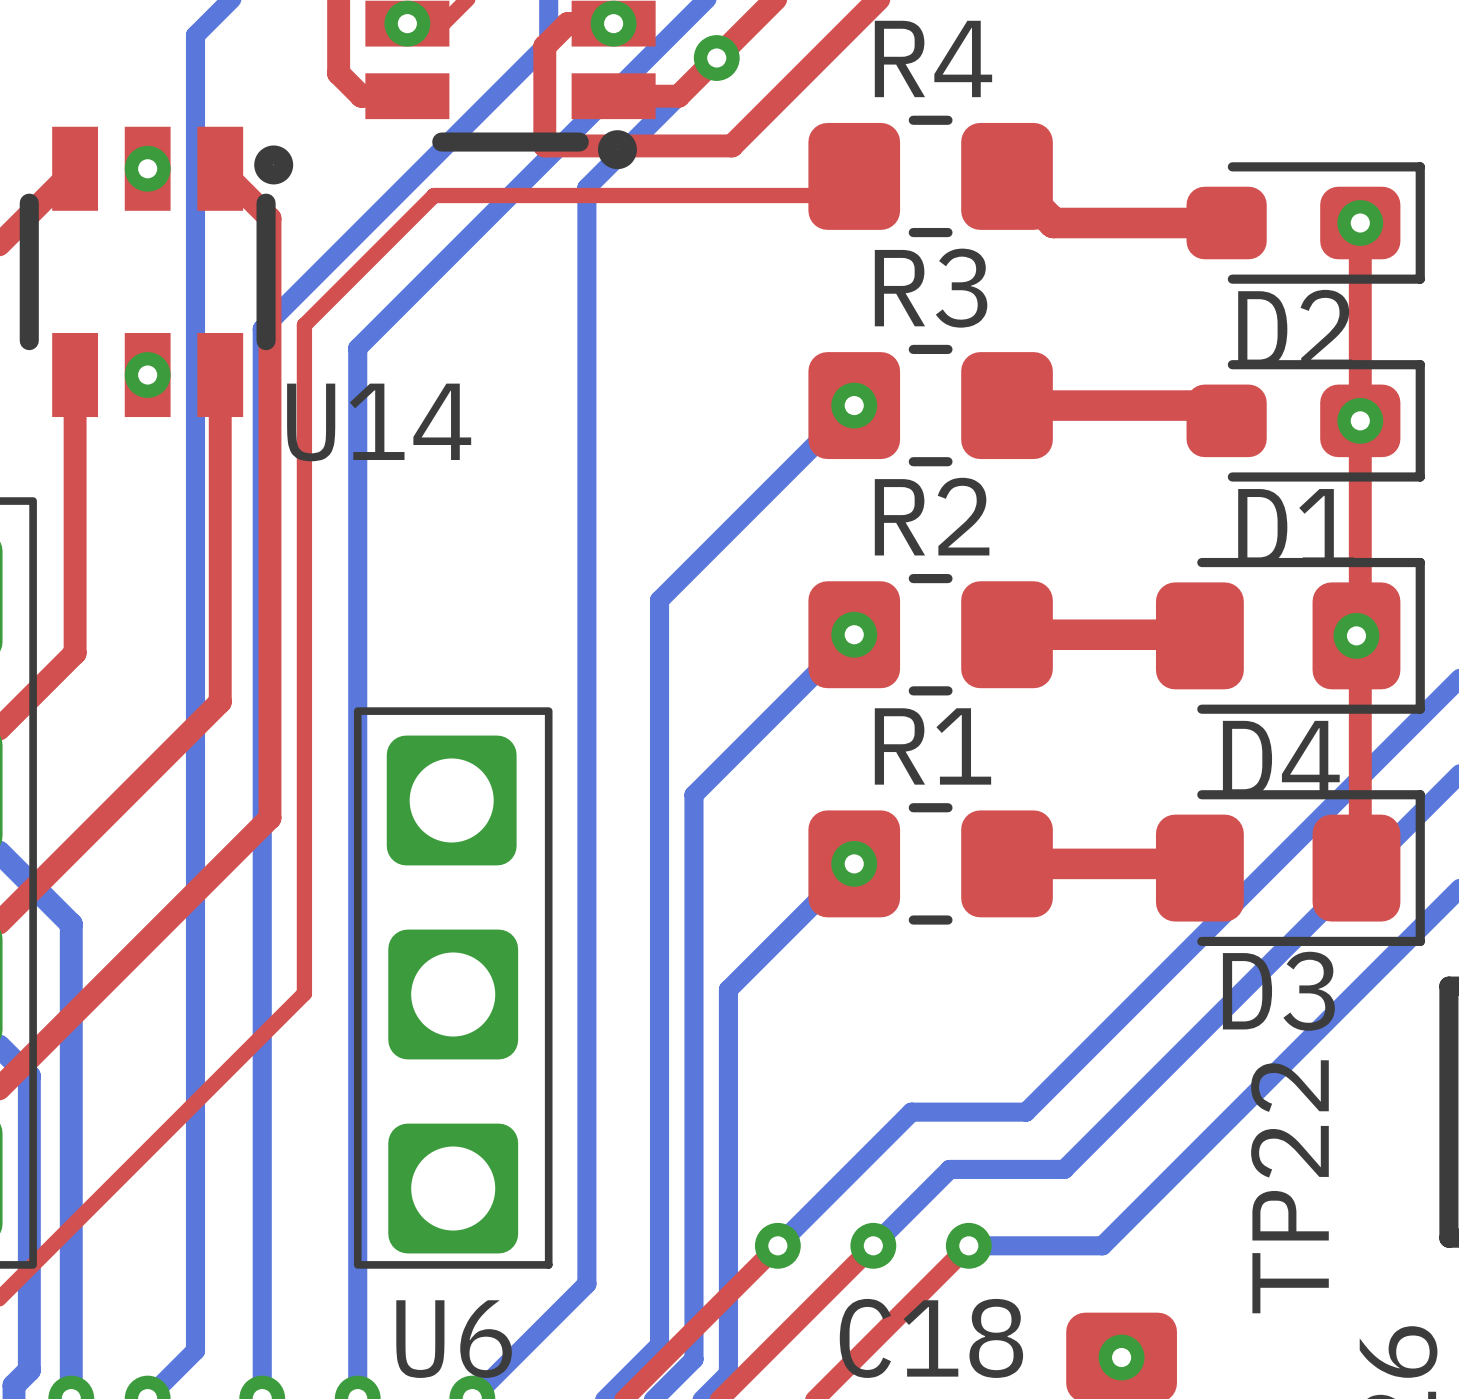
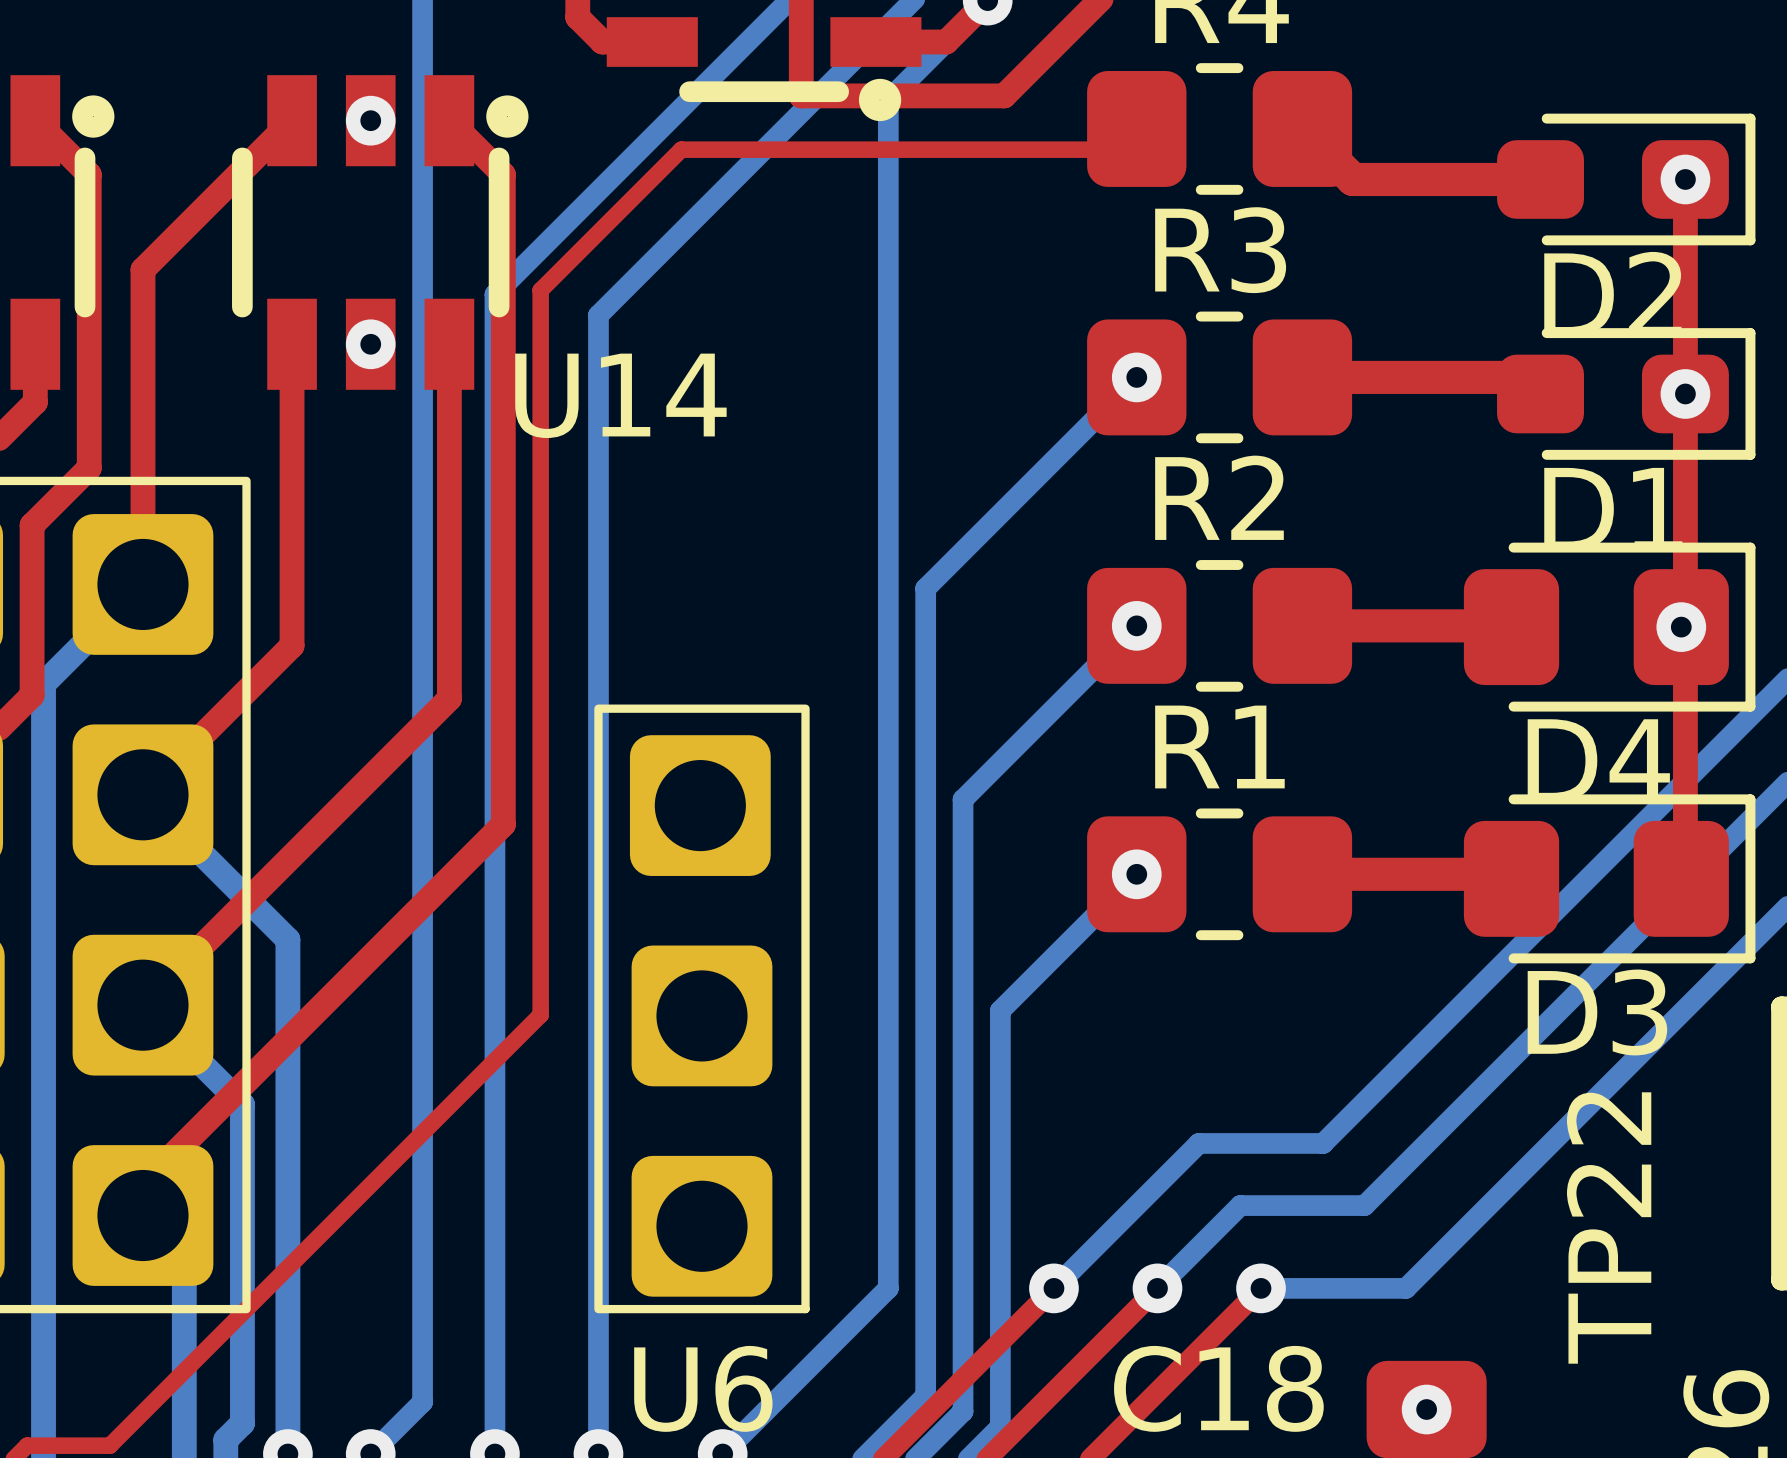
bottom track: (625, 149) (586, 187) (586, 1284) -> (888, 99) (888, 1288) (846, 1329)

